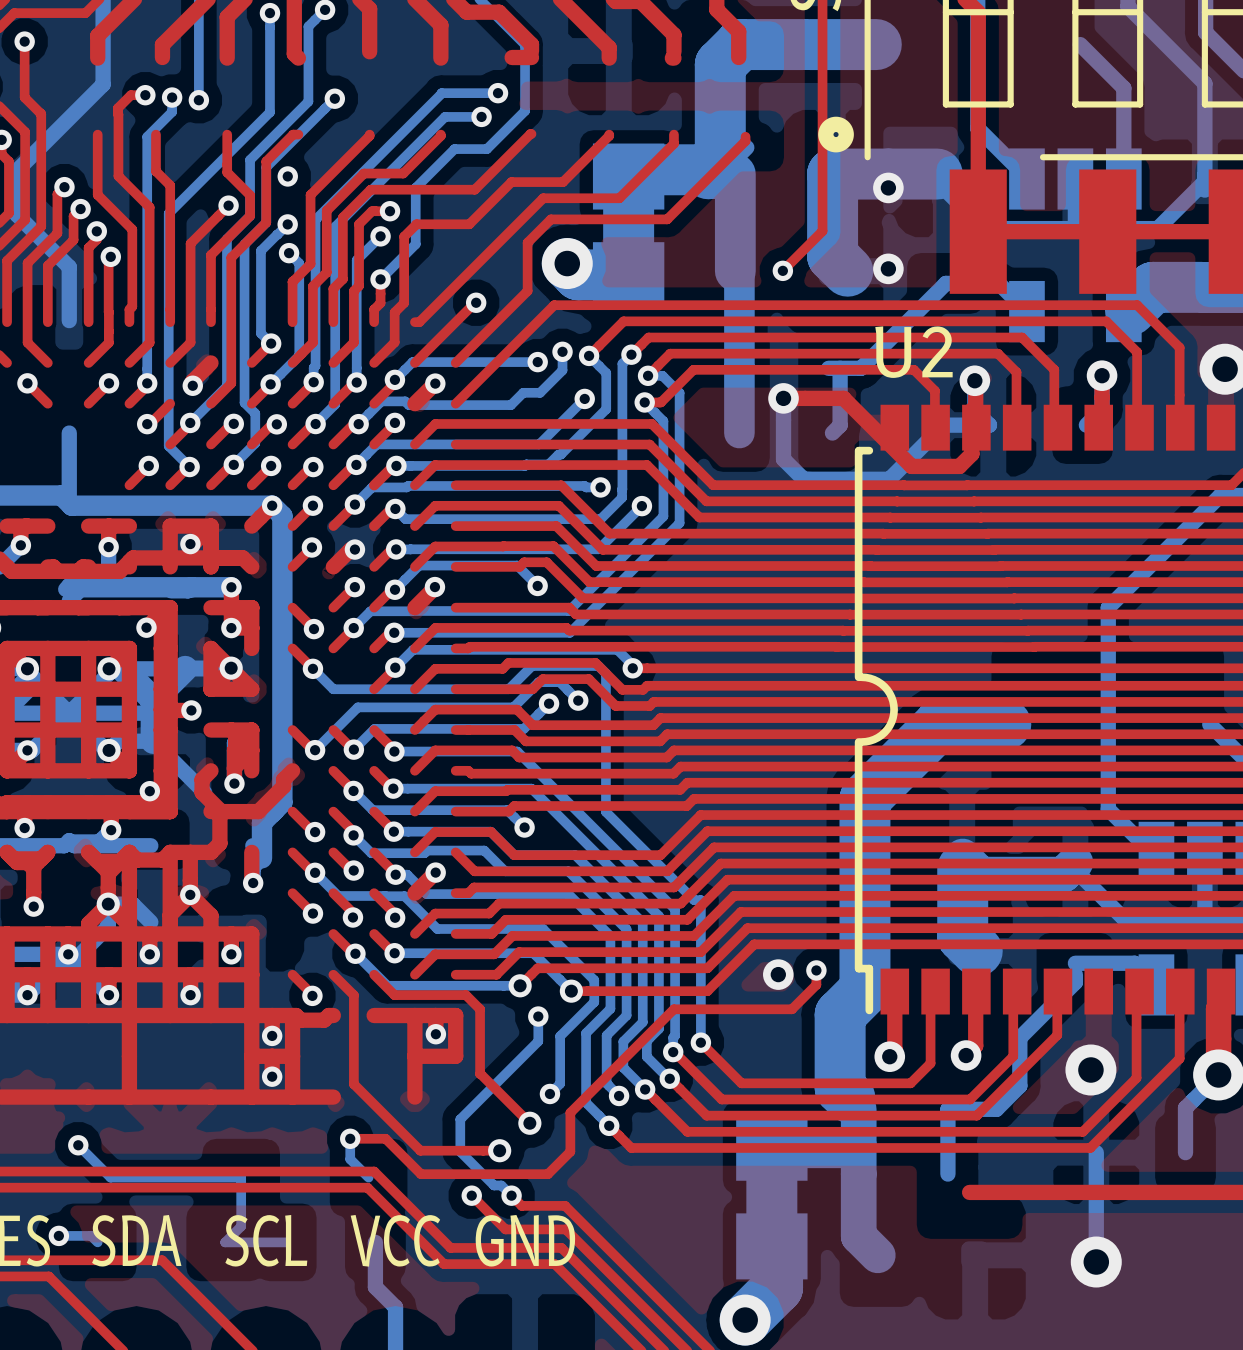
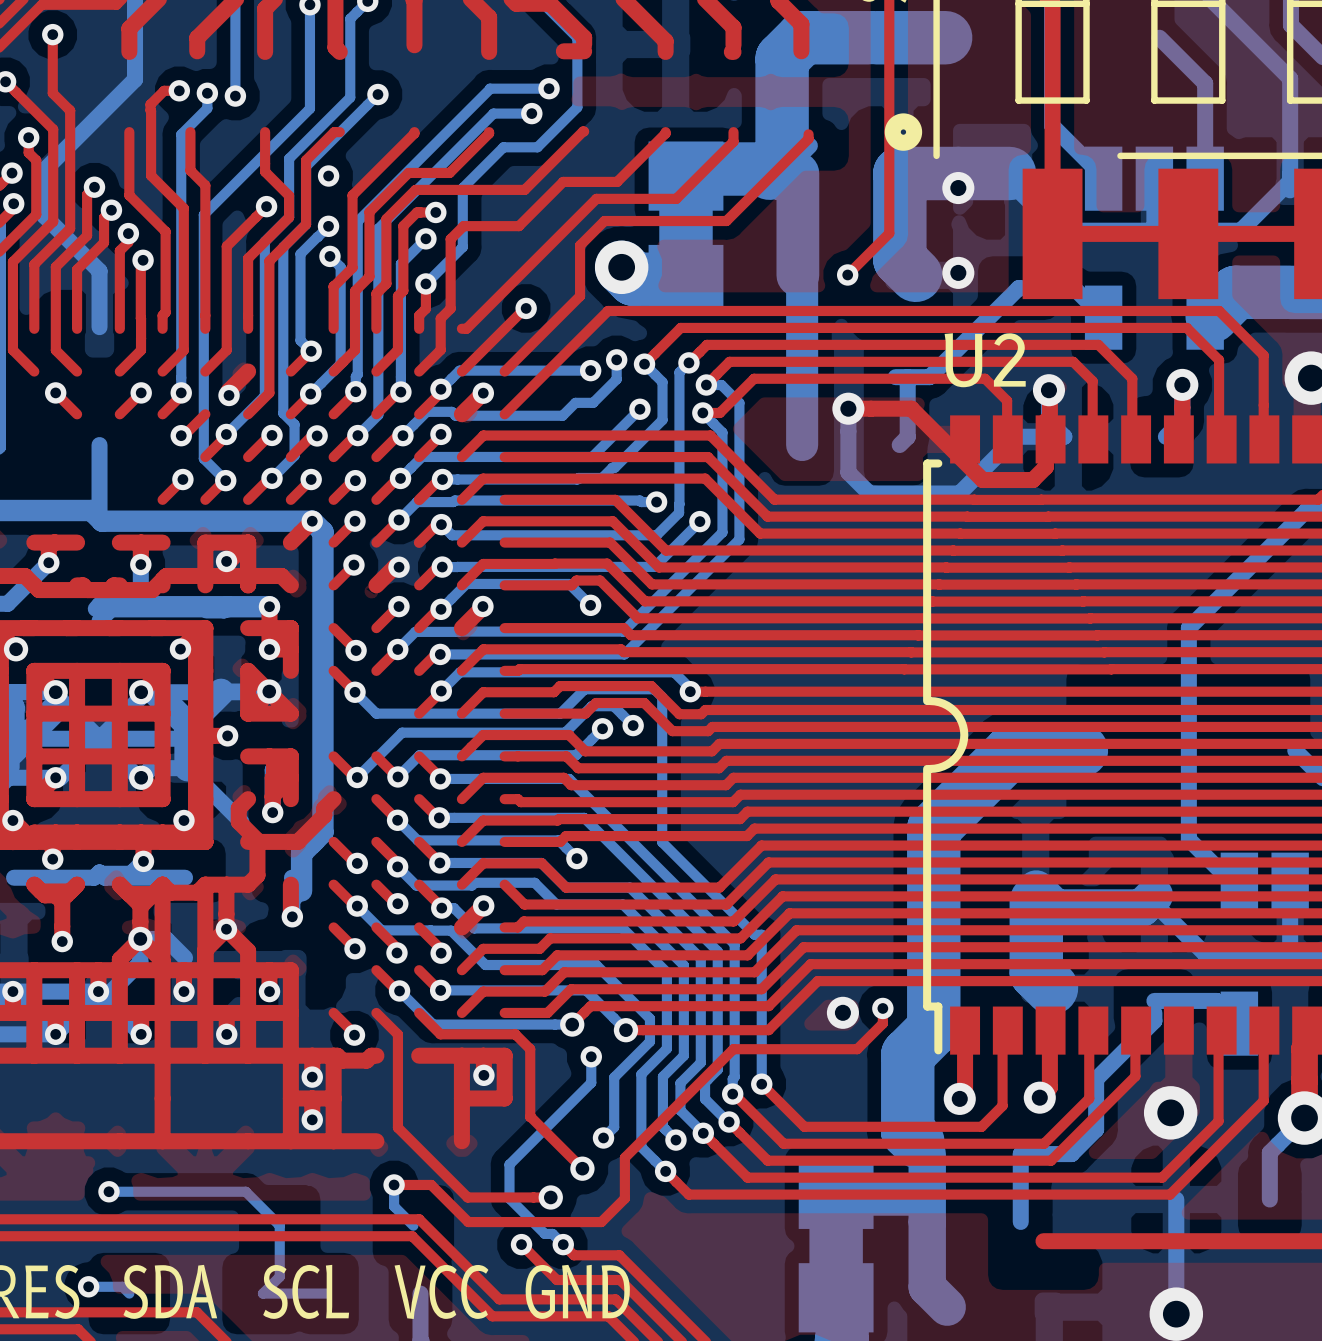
bottom track: (78, 1145) (110, 1177) (241, 1177) -> (108, 1191) (245, 1191) (279, 1225)

